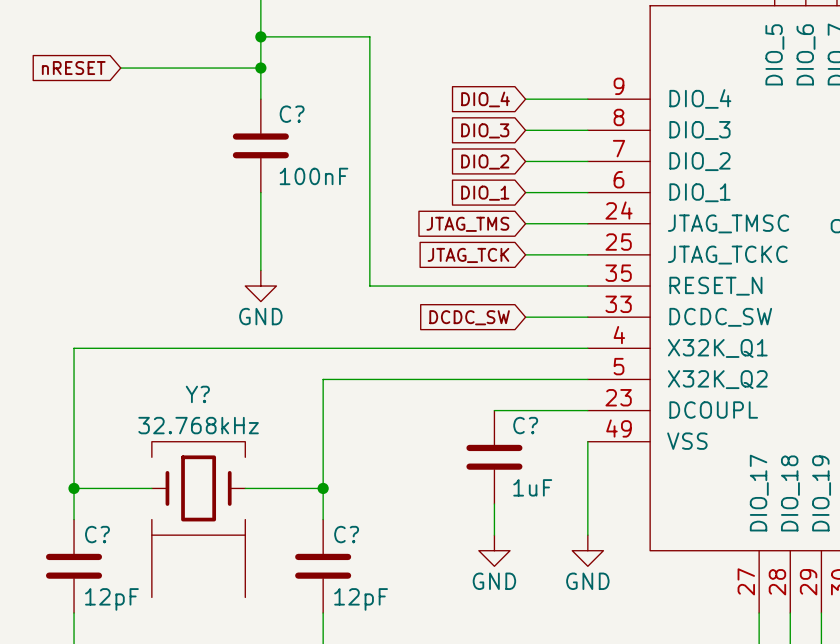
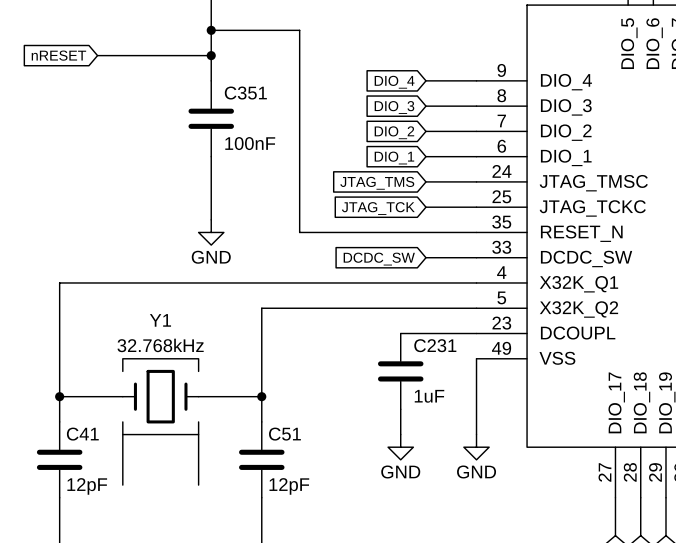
C? name: C? (292, 114) -> C351 (245, 93)
Y? name: Y? (197, 394) -> Y1 (160, 320)
C? name: C? (525, 425) -> C231 (435, 345)
C? name: C? (97, 534) -> C41 (82, 434)
C? name: C? (346, 534) -> C51 (284, 434)

